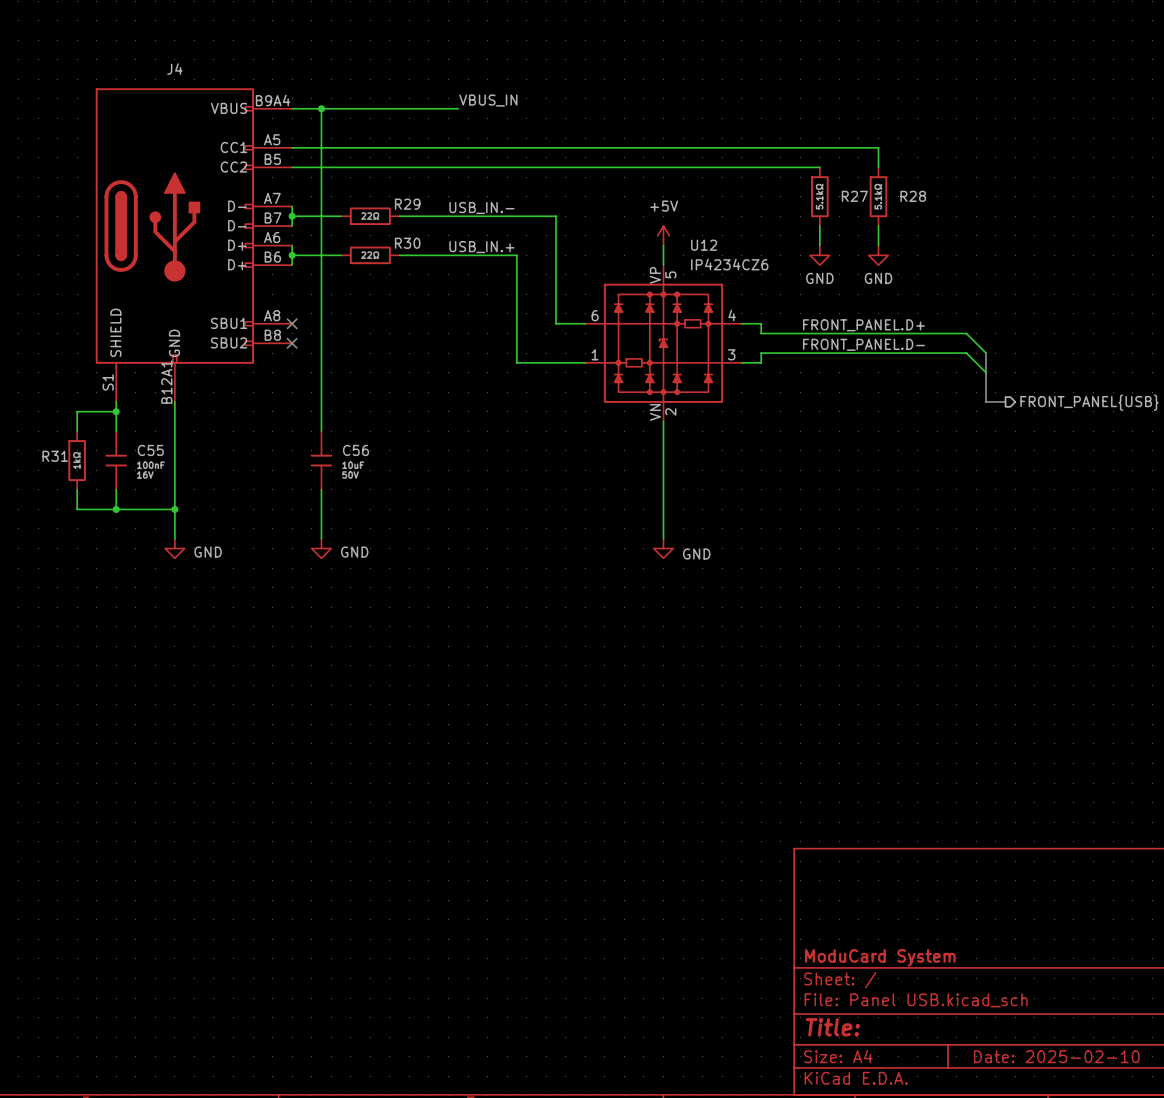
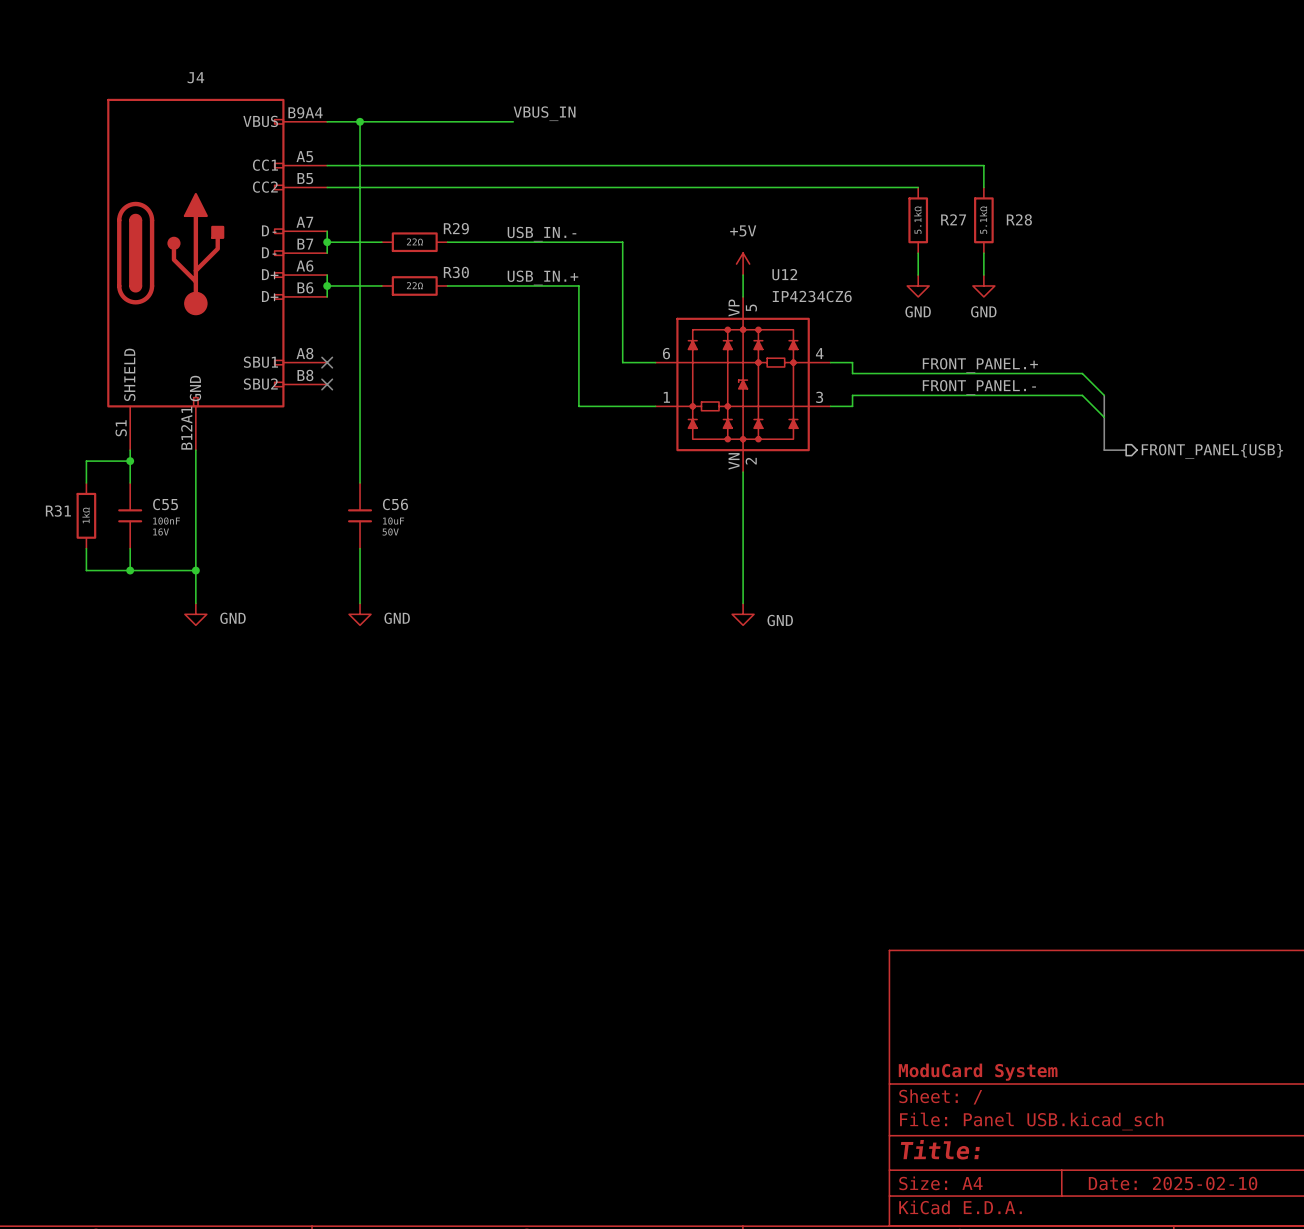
label: FRONT_PANEL.D+ (863, 325) -> FRONT_PANEL.+ (980, 365)
label: FRONT_PANEL.D- (863, 344) -> FRONT_PANEL.- (979, 387)

